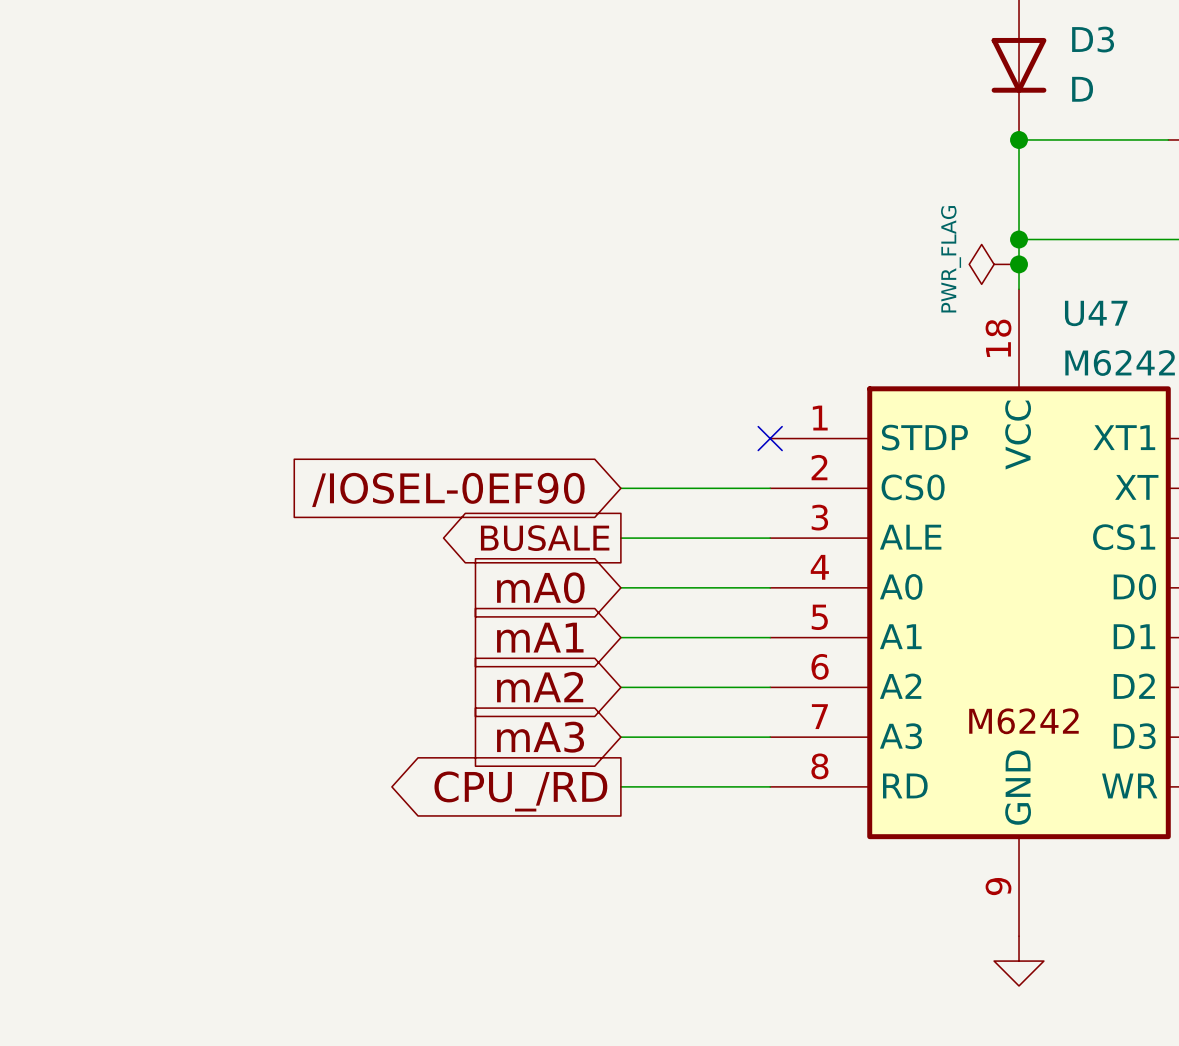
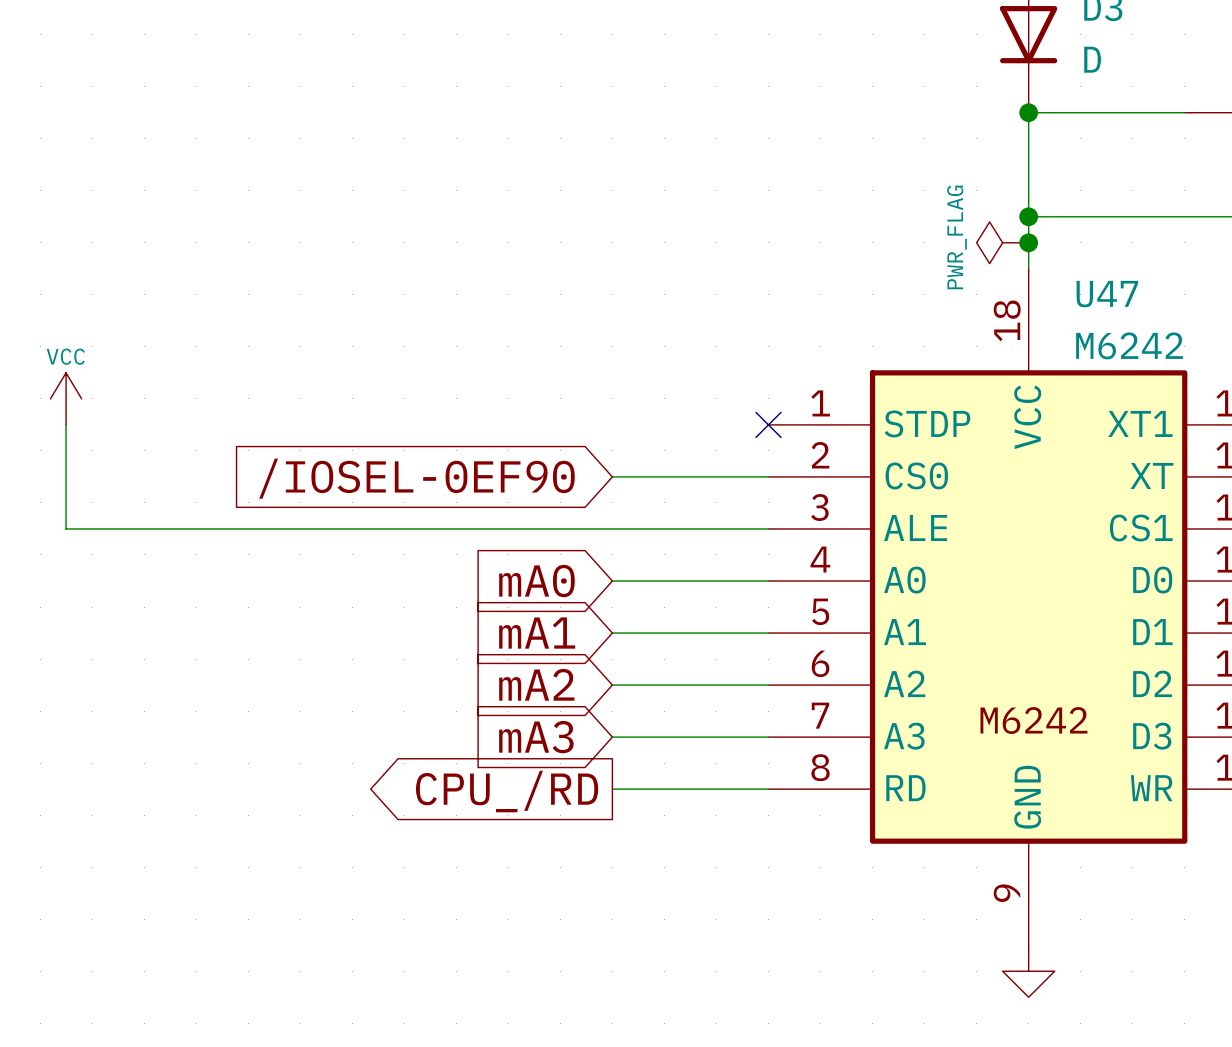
power symbol: none -> VCC (66, 398)
wire: none -> (66, 424) (66, 528) (612, 528)
global label: BUSALE (545, 538) -> none

